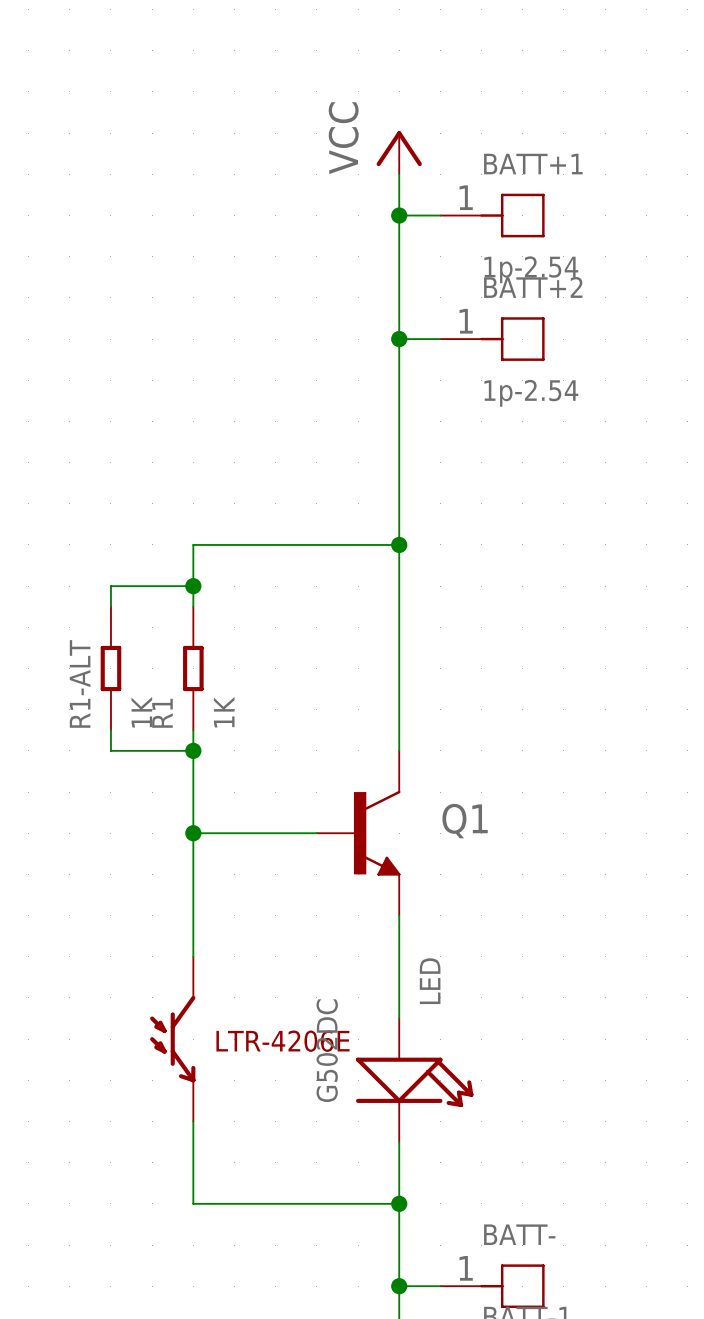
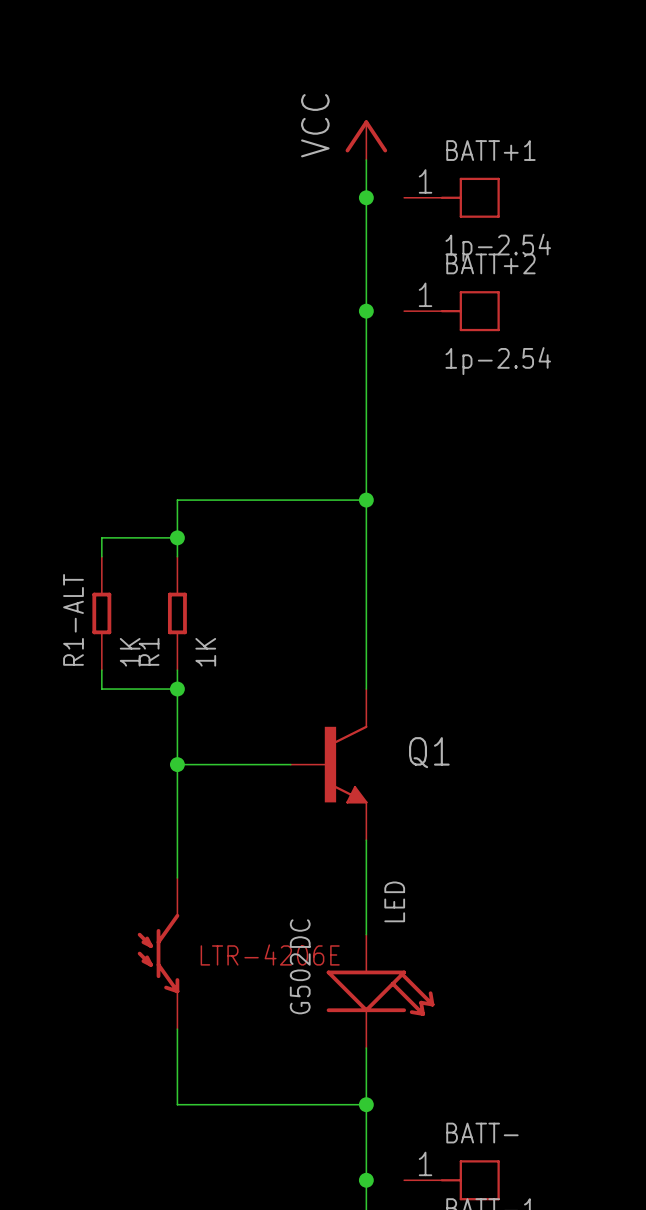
wire: (399, 215) (440, 215) -> none
wire: (399, 339) (440, 339) -> none
wire: (399, 1286) (440, 1286) -> none

